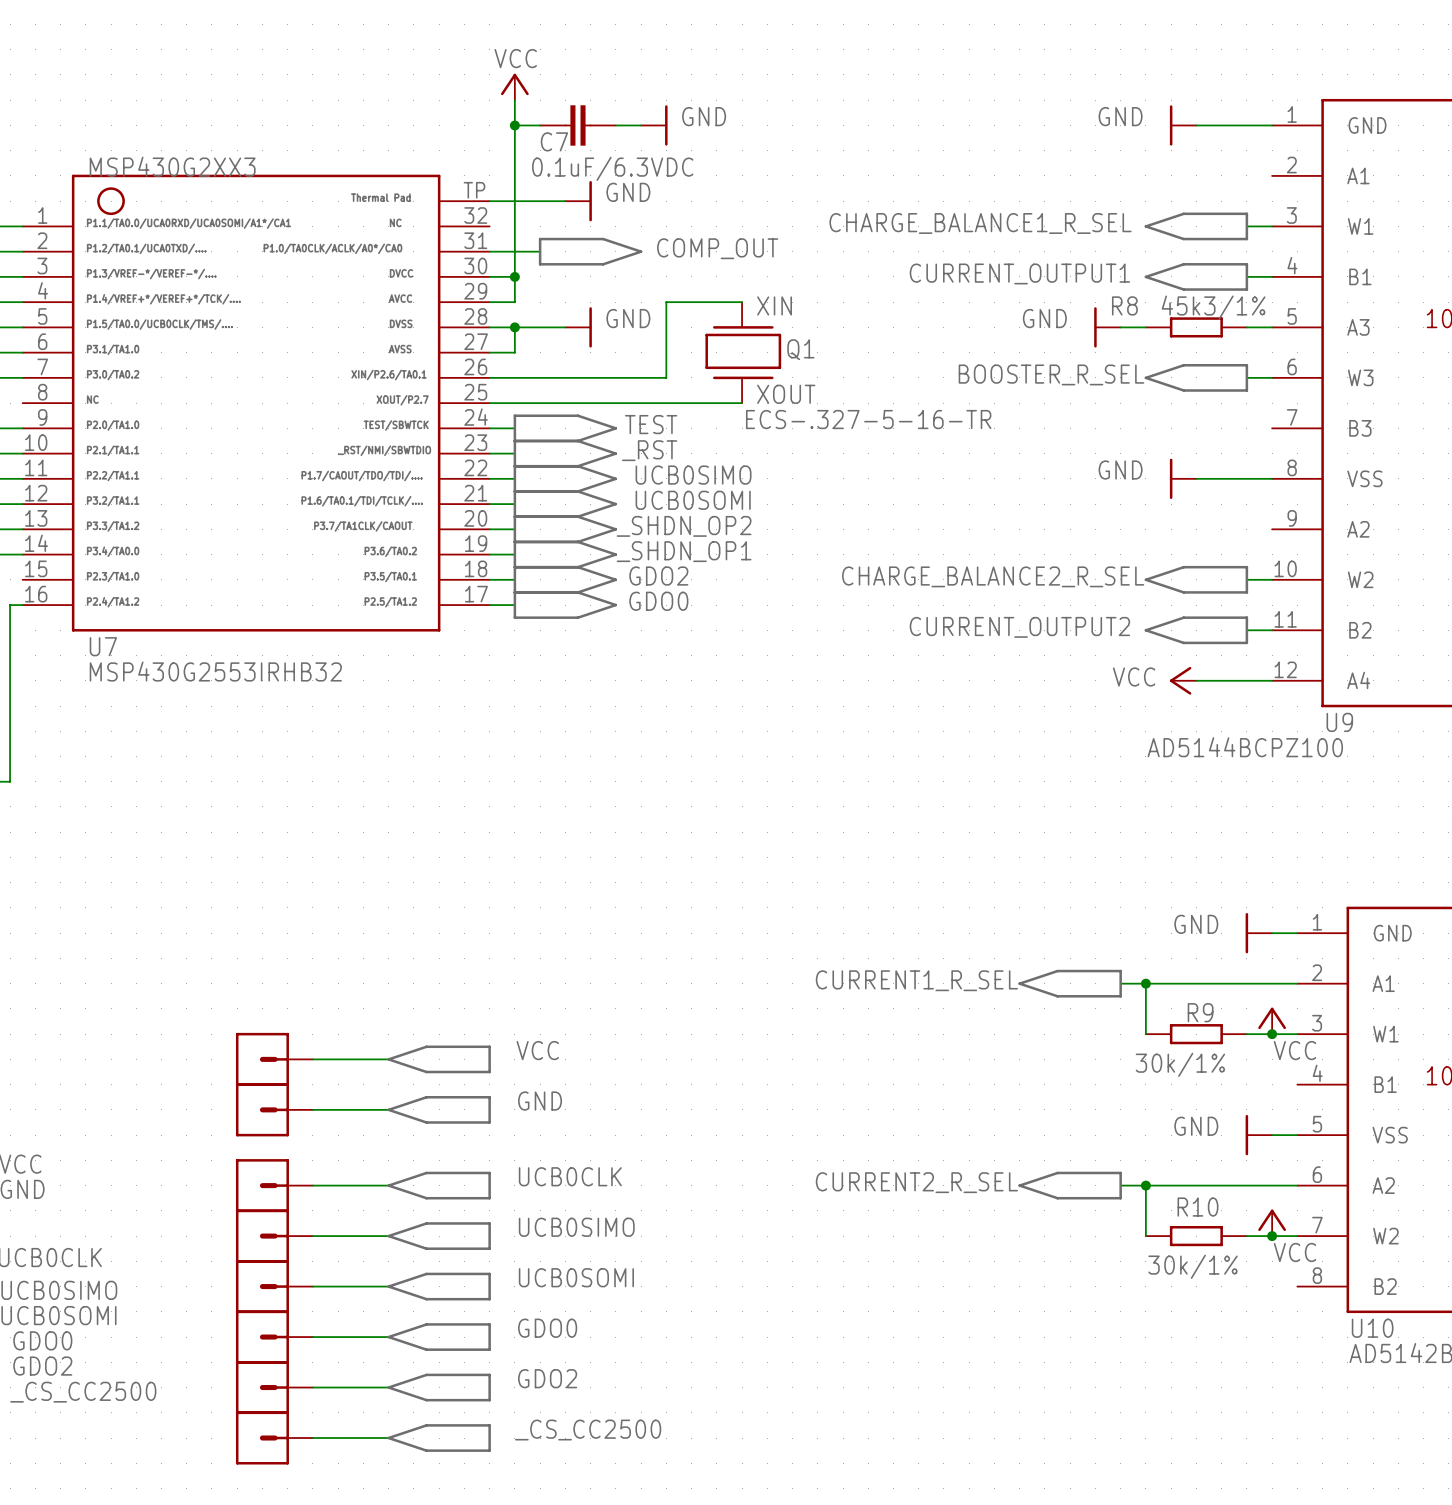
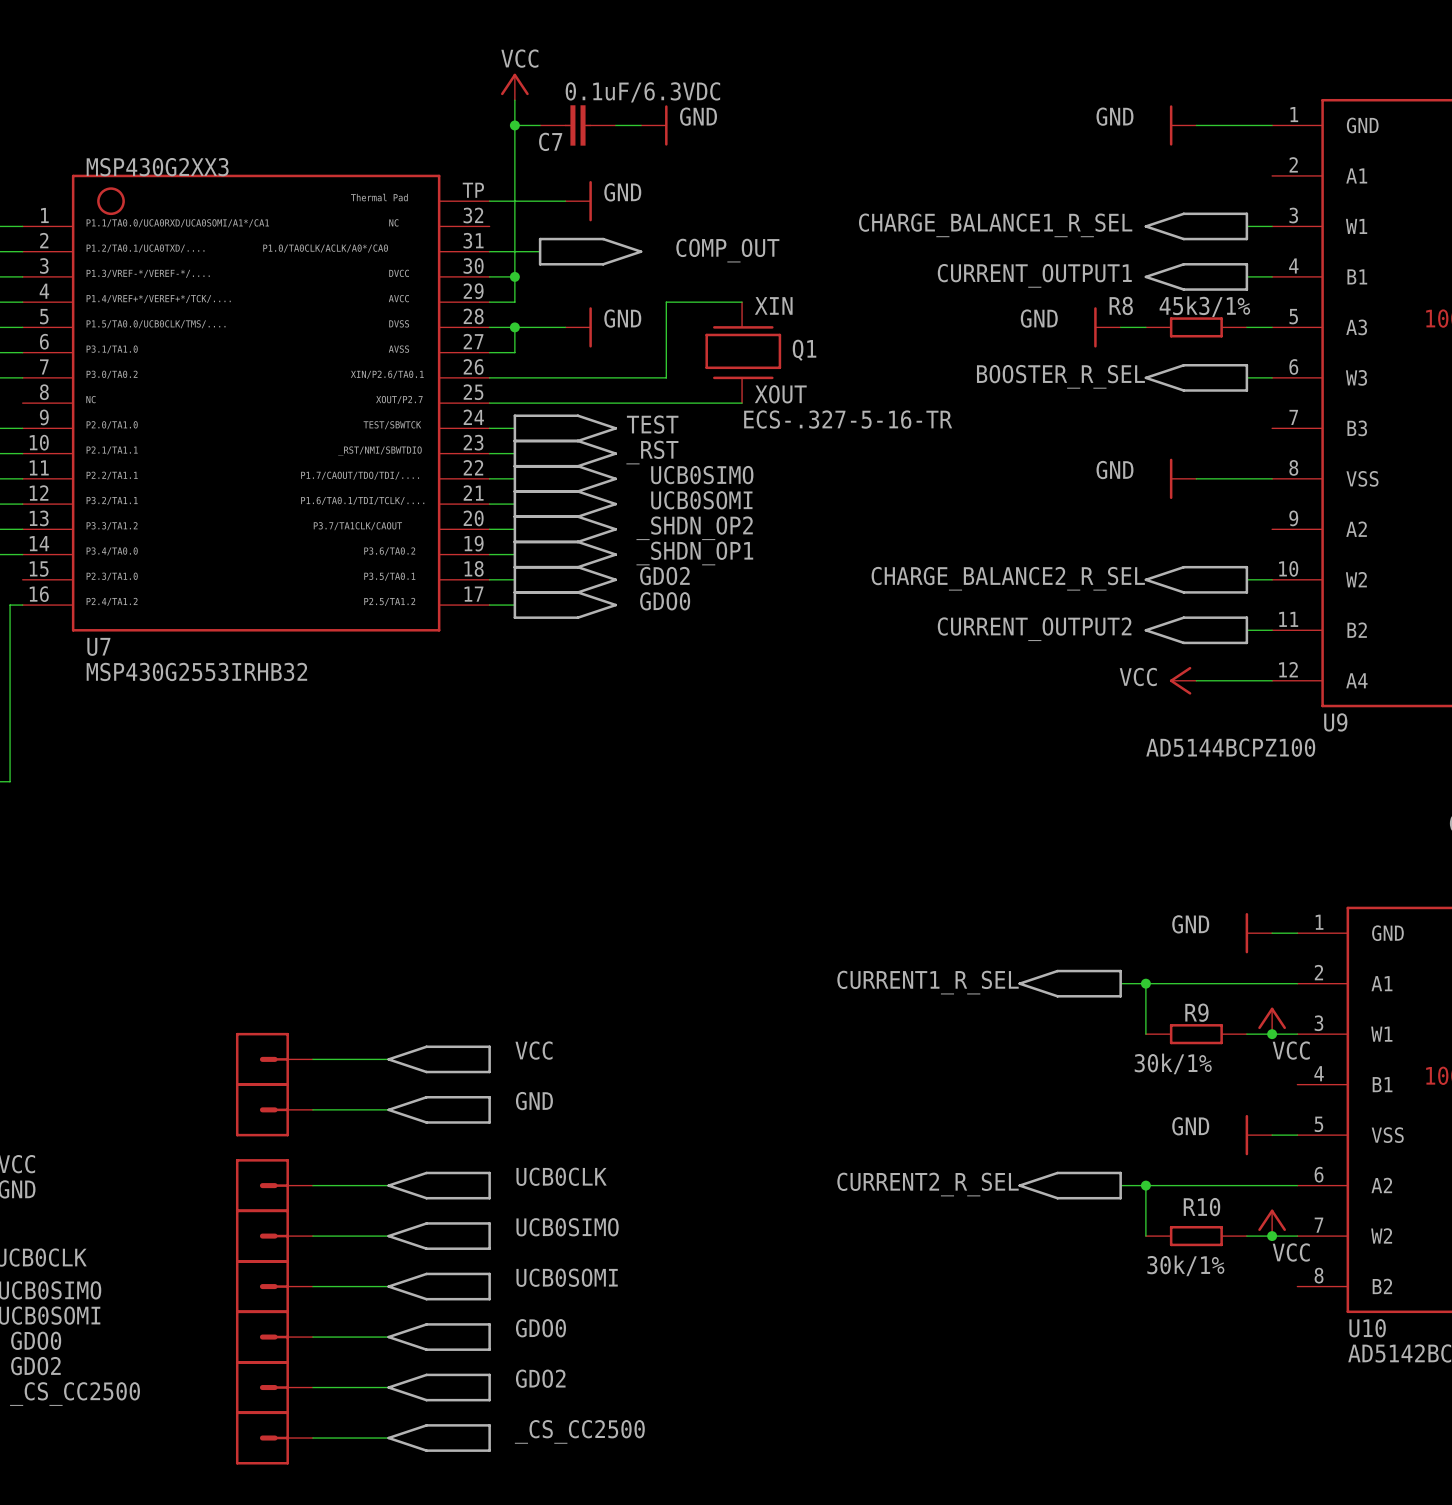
C7 value position: 0.1uF/6.3VDC (612, 168) -> 0.1uF/6.3VDC (642, 92)

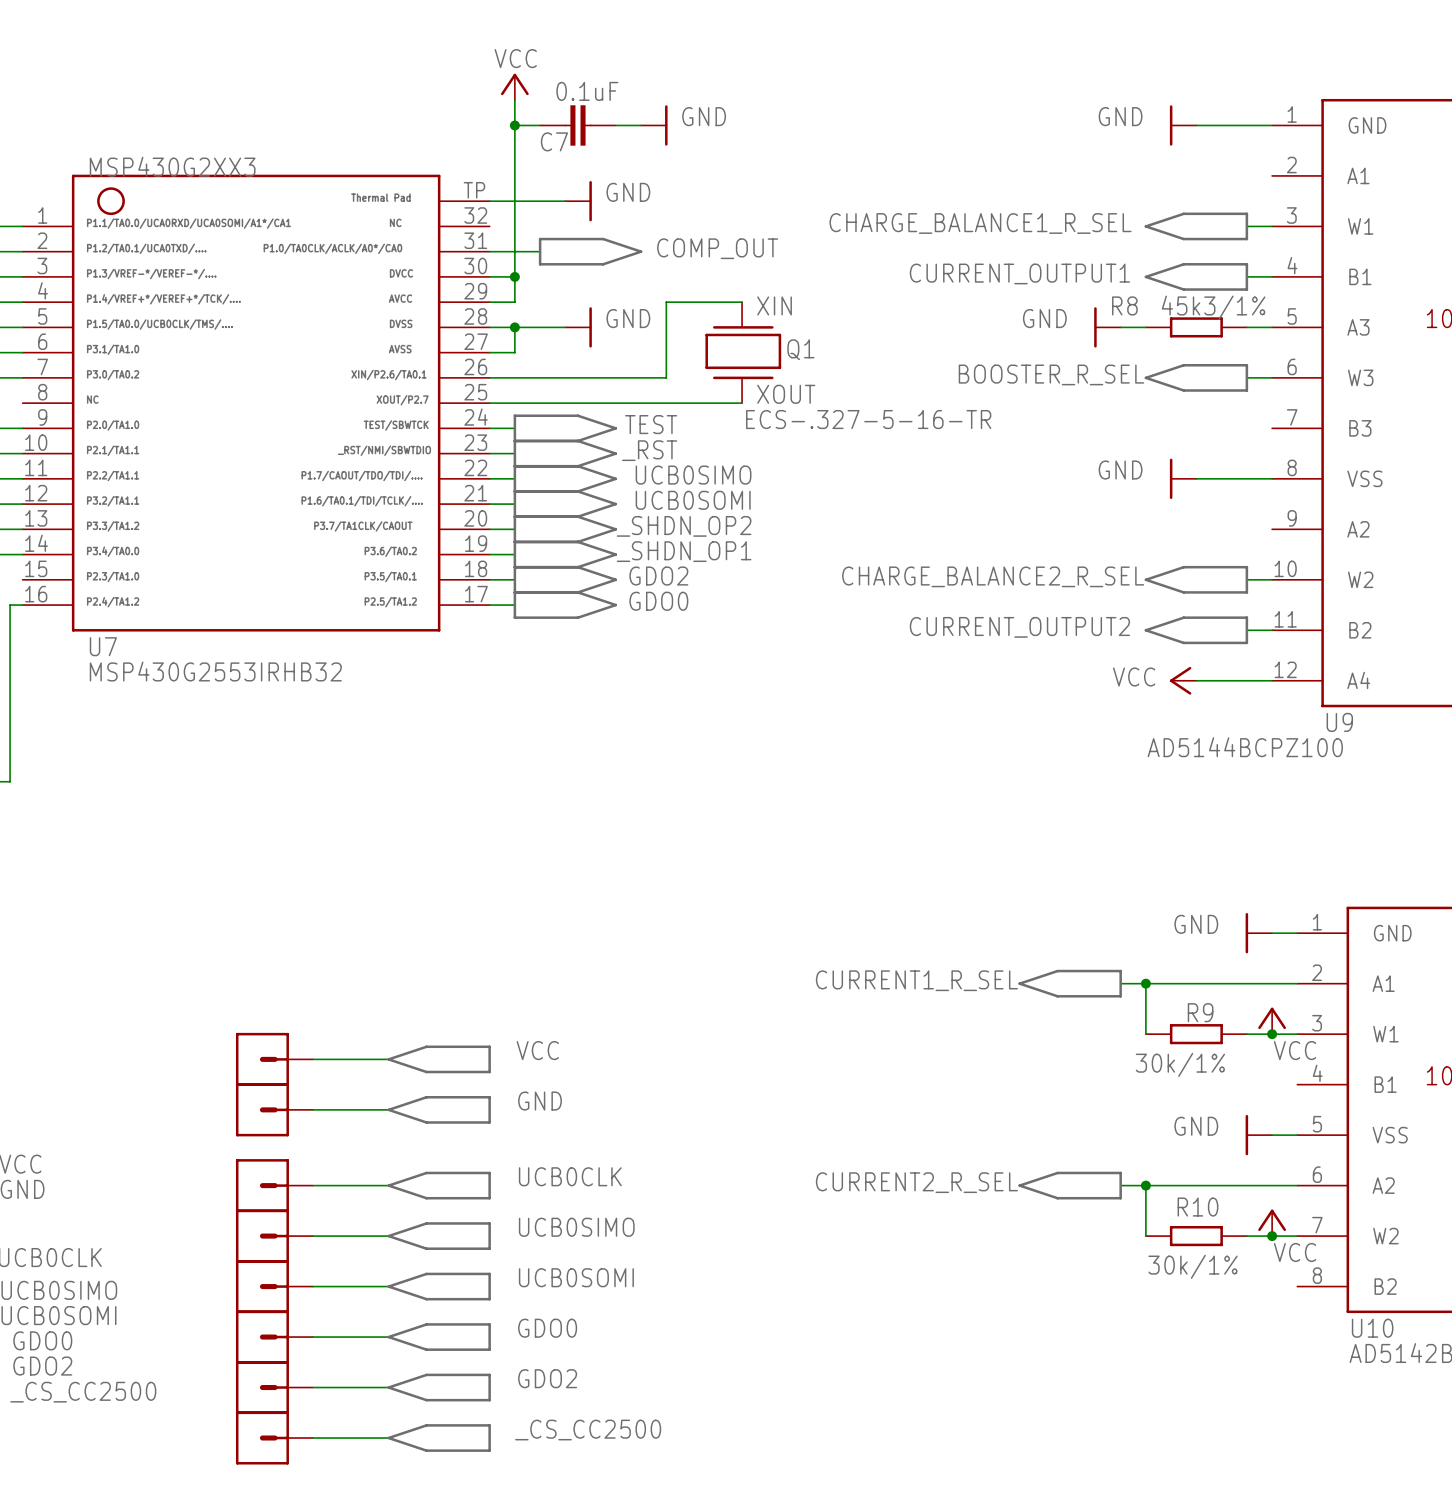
C7 value: 0.1uF/6.3VDC (642, 92) -> 0.1uF (587, 91)

